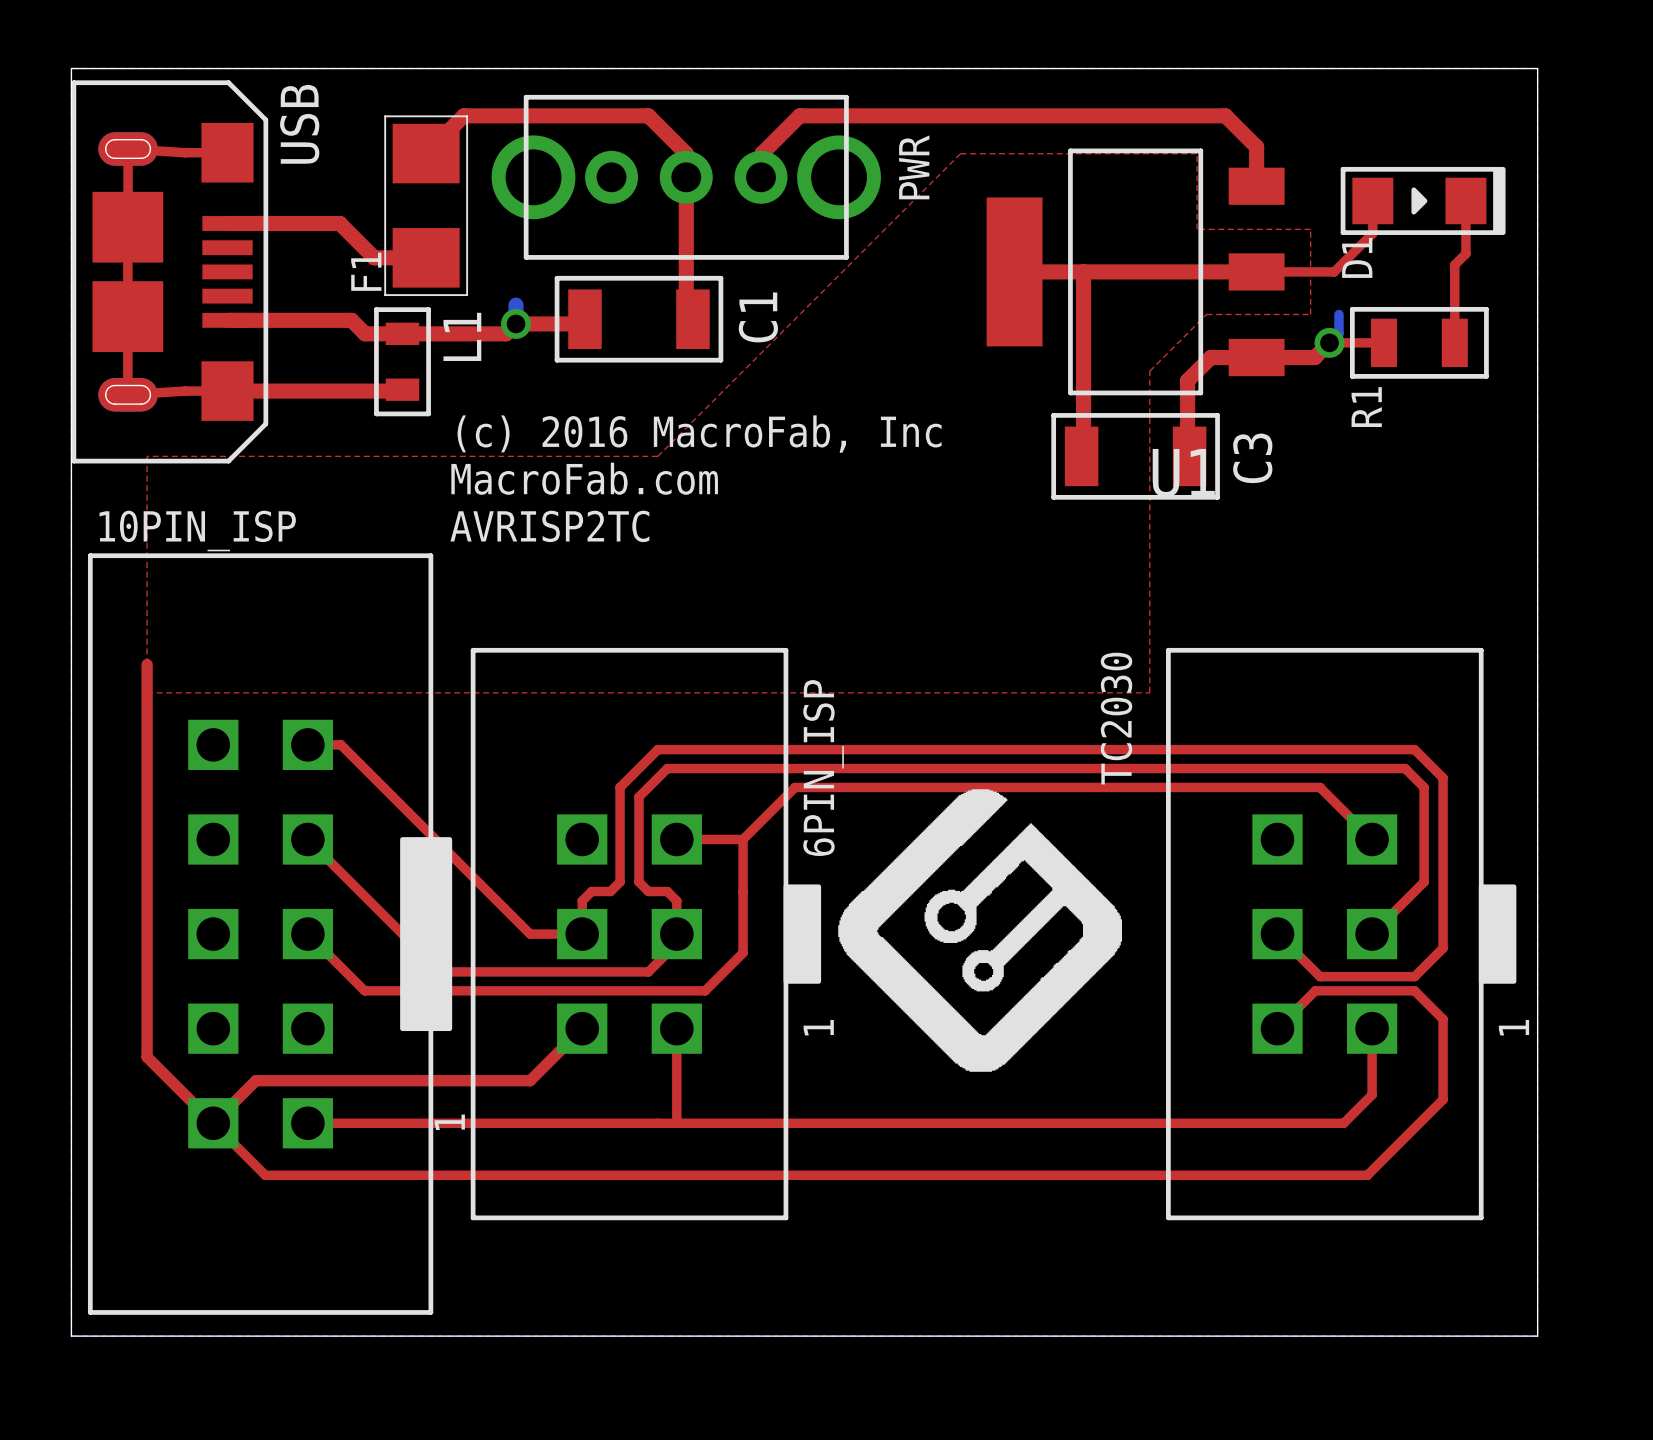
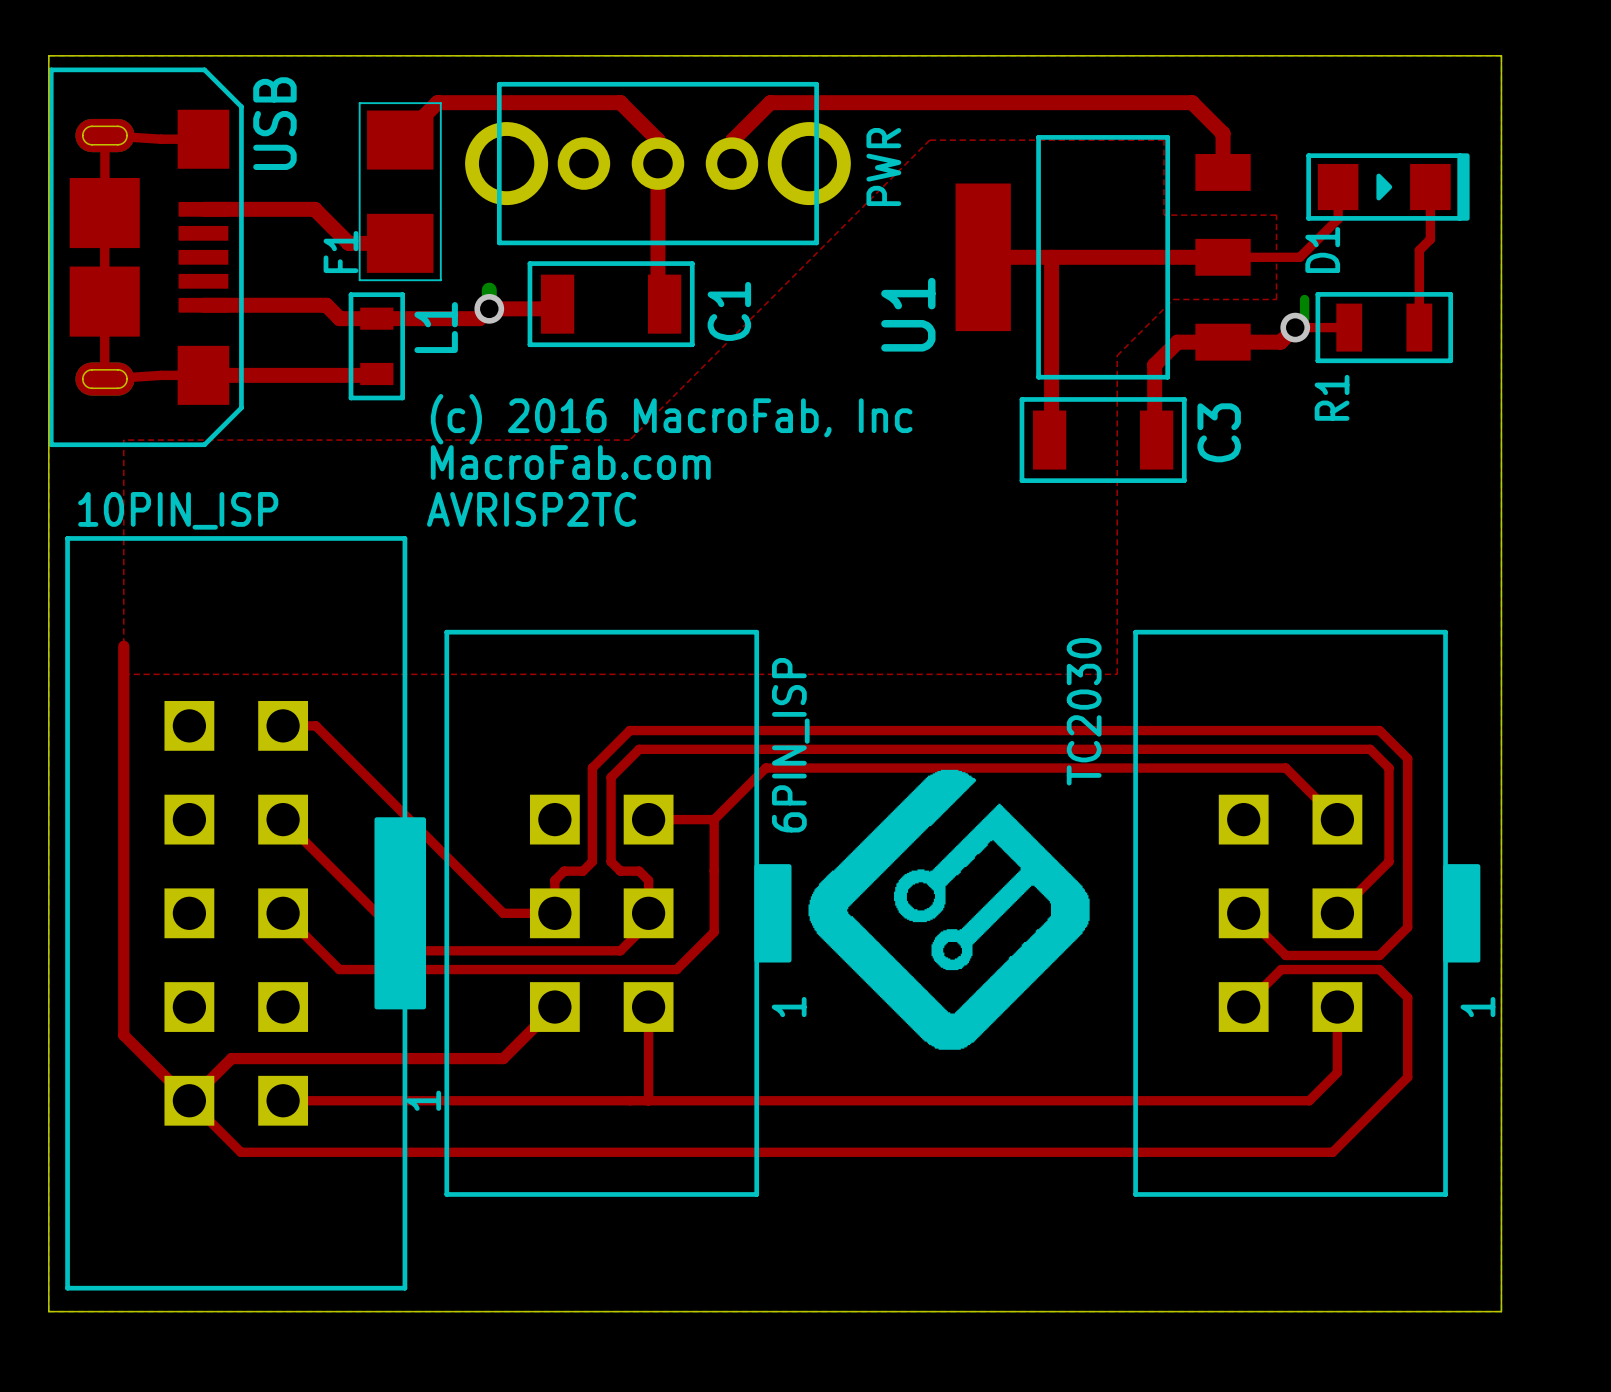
U1 name rotation: 0° (1183, 473) -> 90° counterclockwise (908, 314)
U1 name position: U1 (1183, 473) -> U1 (908, 314)

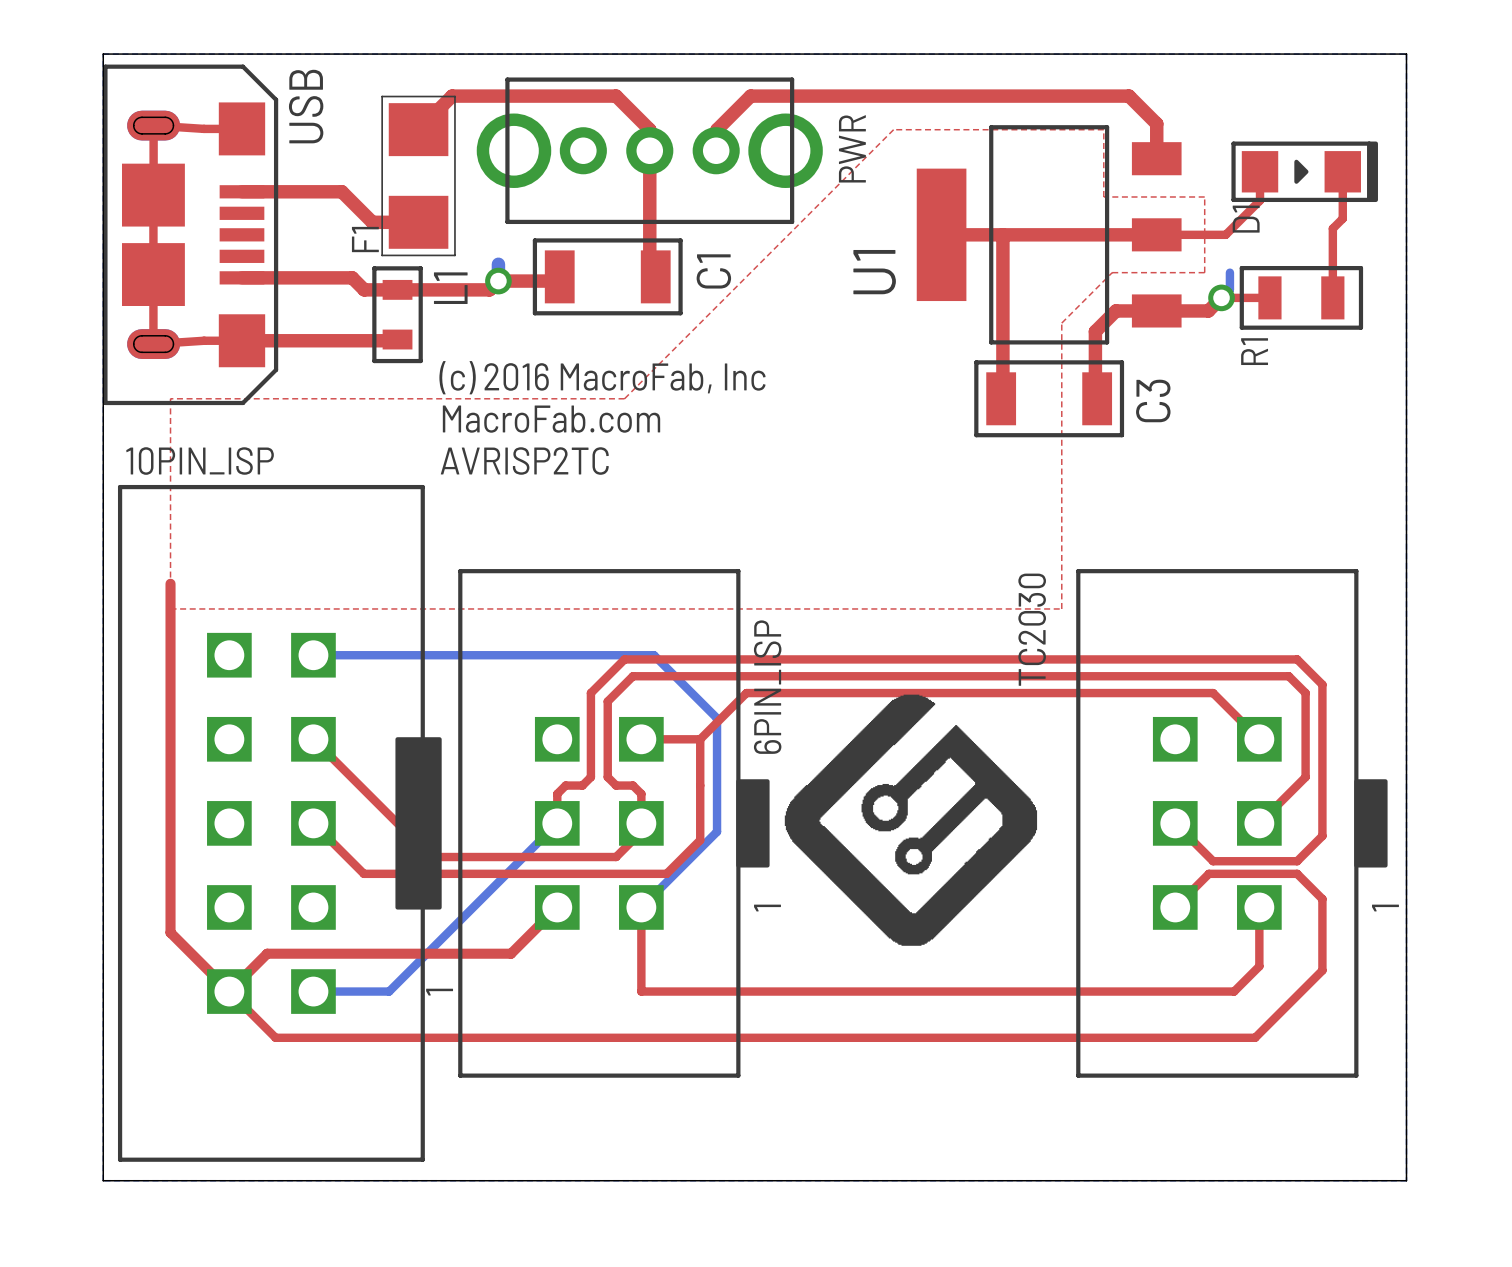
top track: (283, 725) (315, 725) (503, 913) (554, 913) -> none
bottom track: none -> (313, 655) (653, 655) (717, 718) (717, 831) (641, 907)
bottom track: none -> (557, 823) (389, 991) (313, 991)
top track: (283, 1100) (648, 1100) -> none

